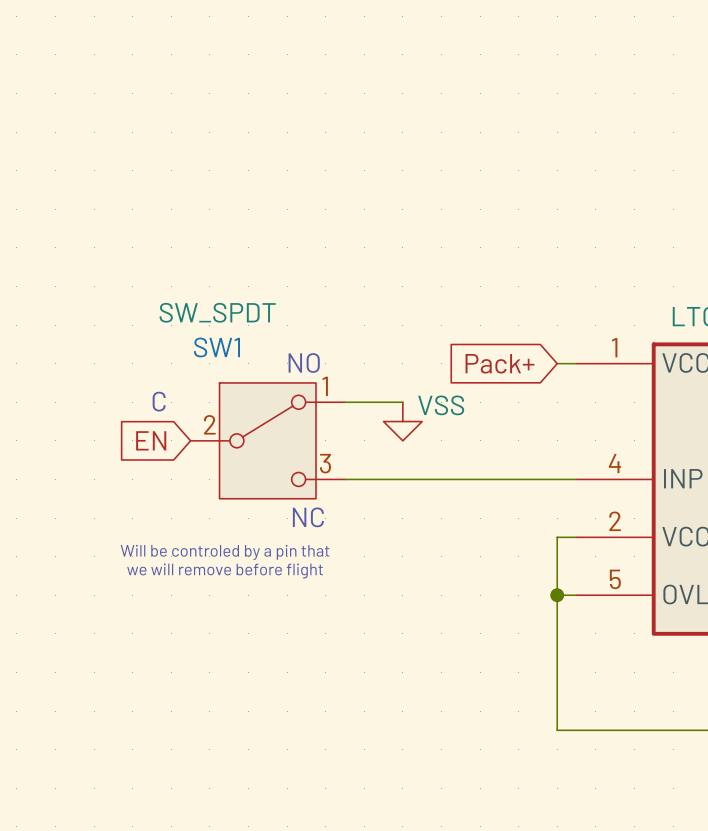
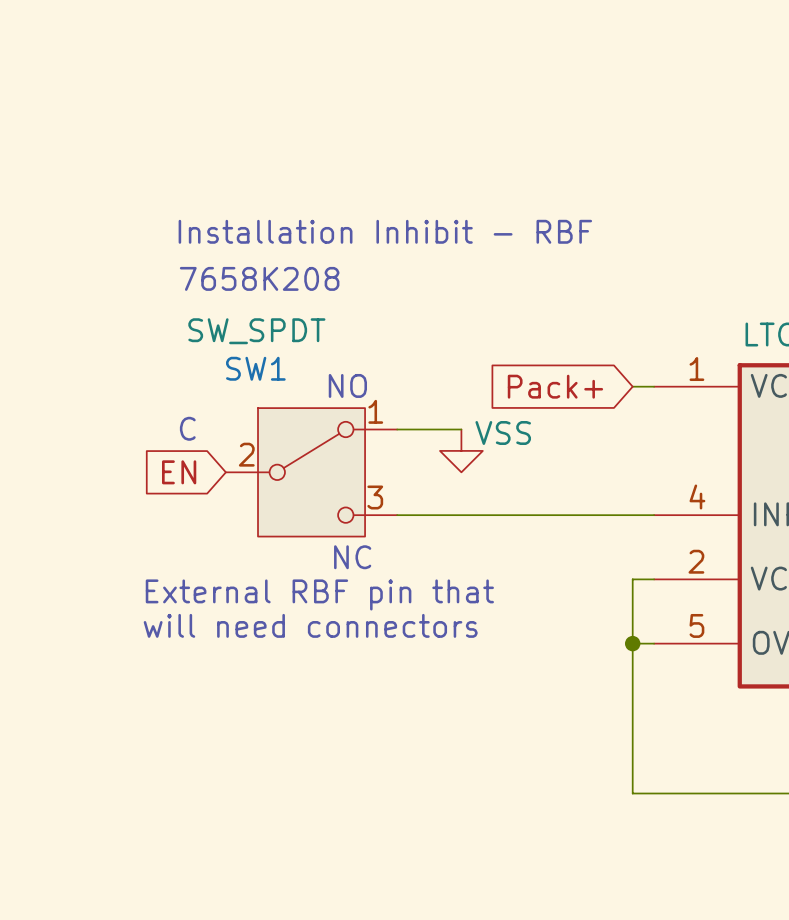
text: none -> Installation Inhibit - RBF (385, 231)
text: none -> 7658K208 (259, 278)
text: none -> External RBF pin that (319, 594)
text: Will be controled by a pin that (225, 552) -> none
text: we will remove before flight (225, 571) -> none
text: none -> will need connectors (310, 625)

